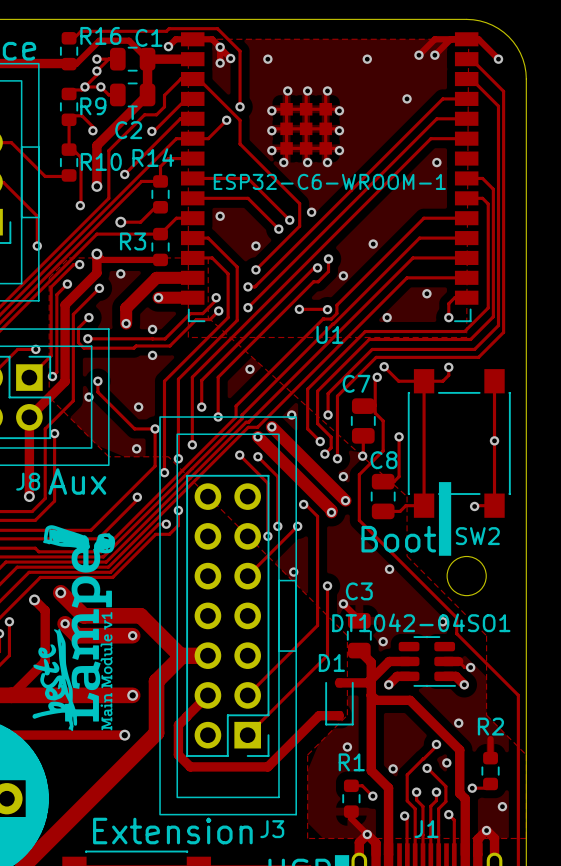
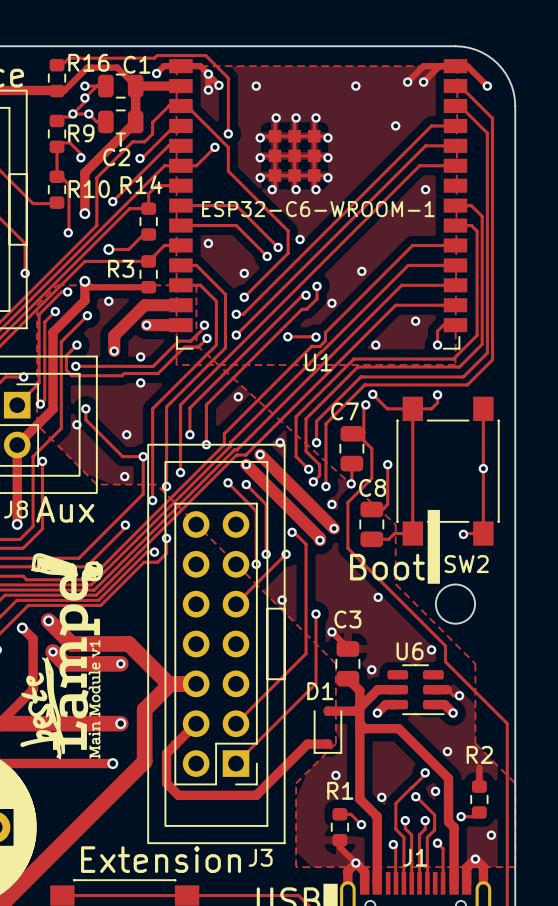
DT1042-04SO1 name: DT1042-04SO1 (421, 622) -> U6 (410, 651)

